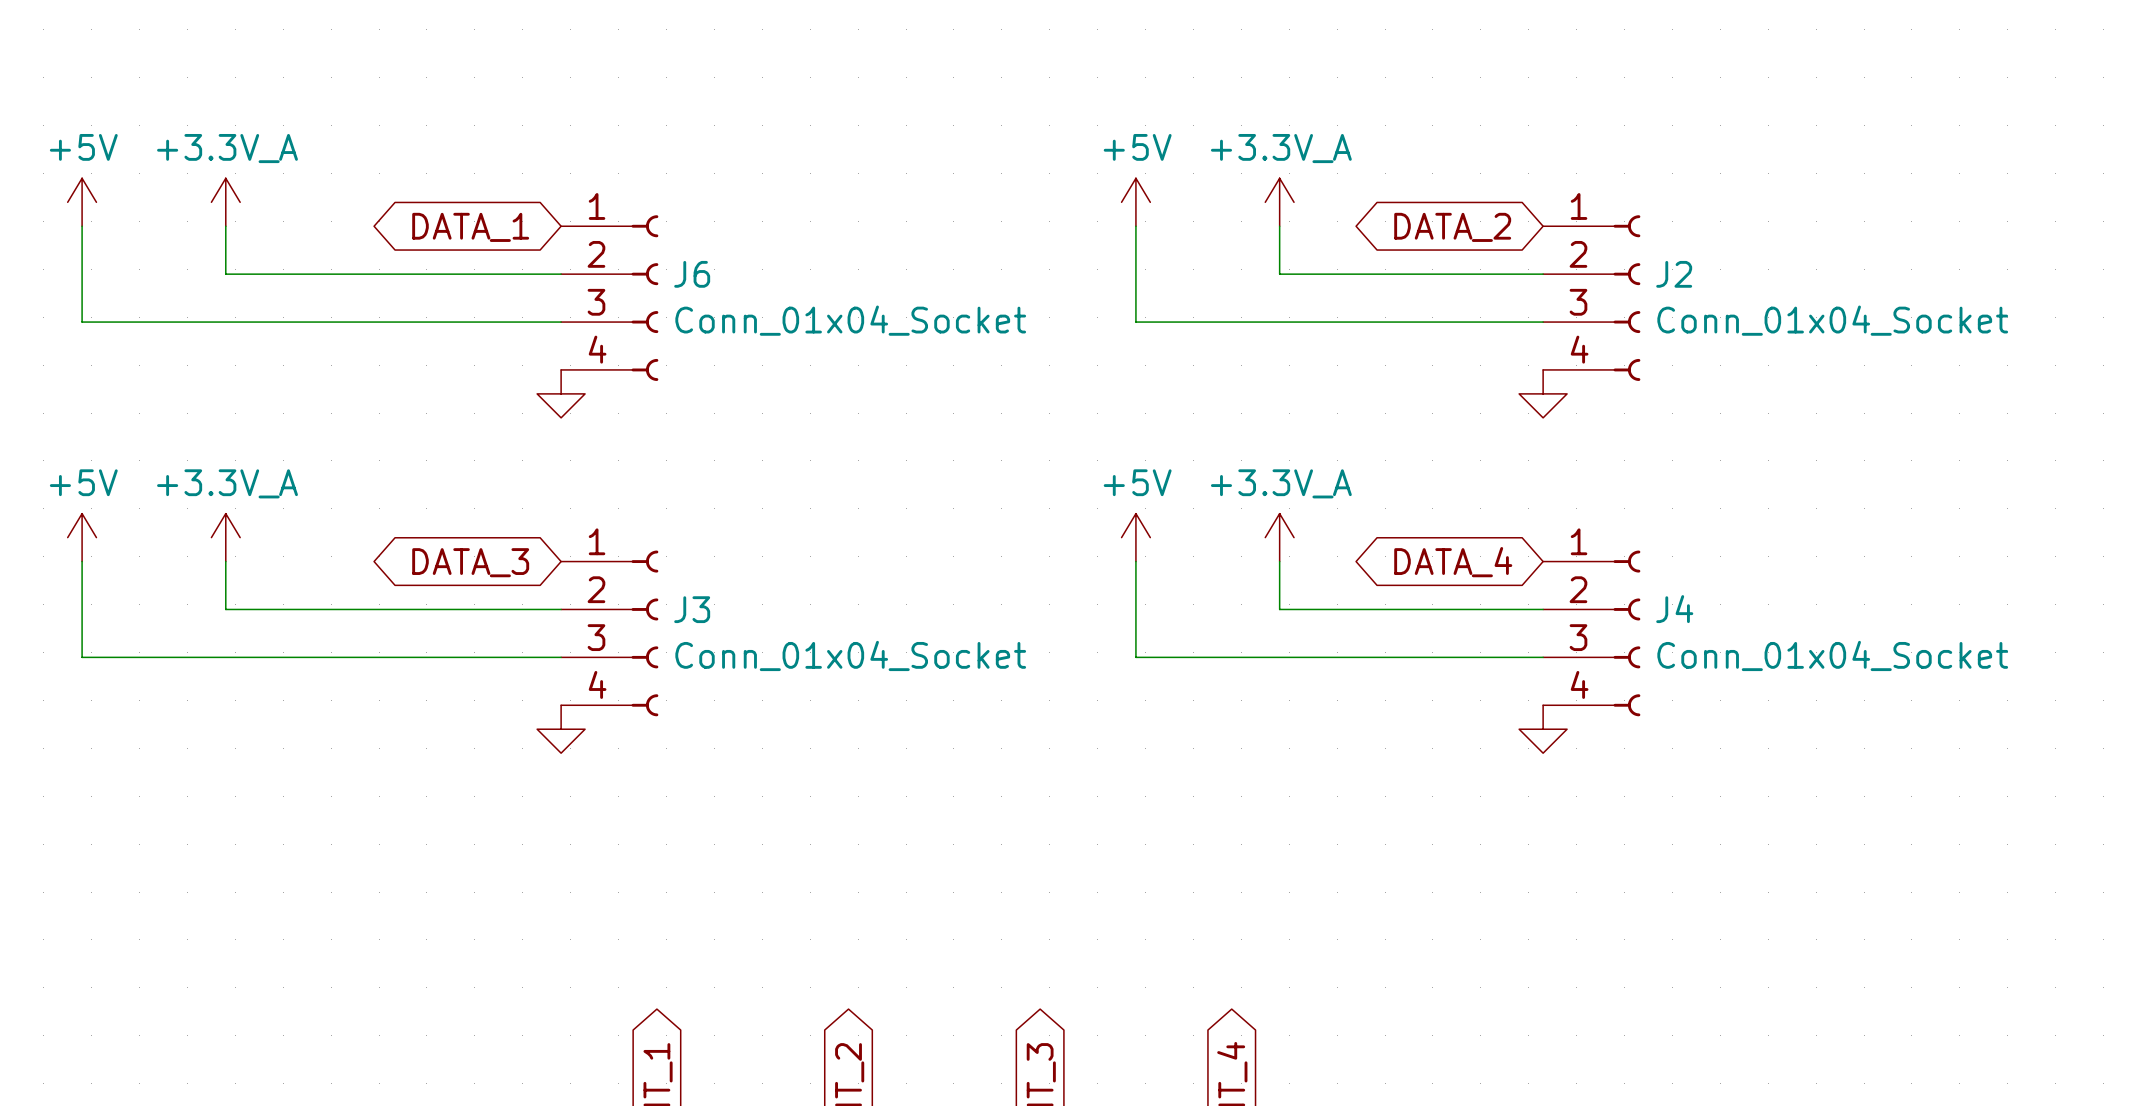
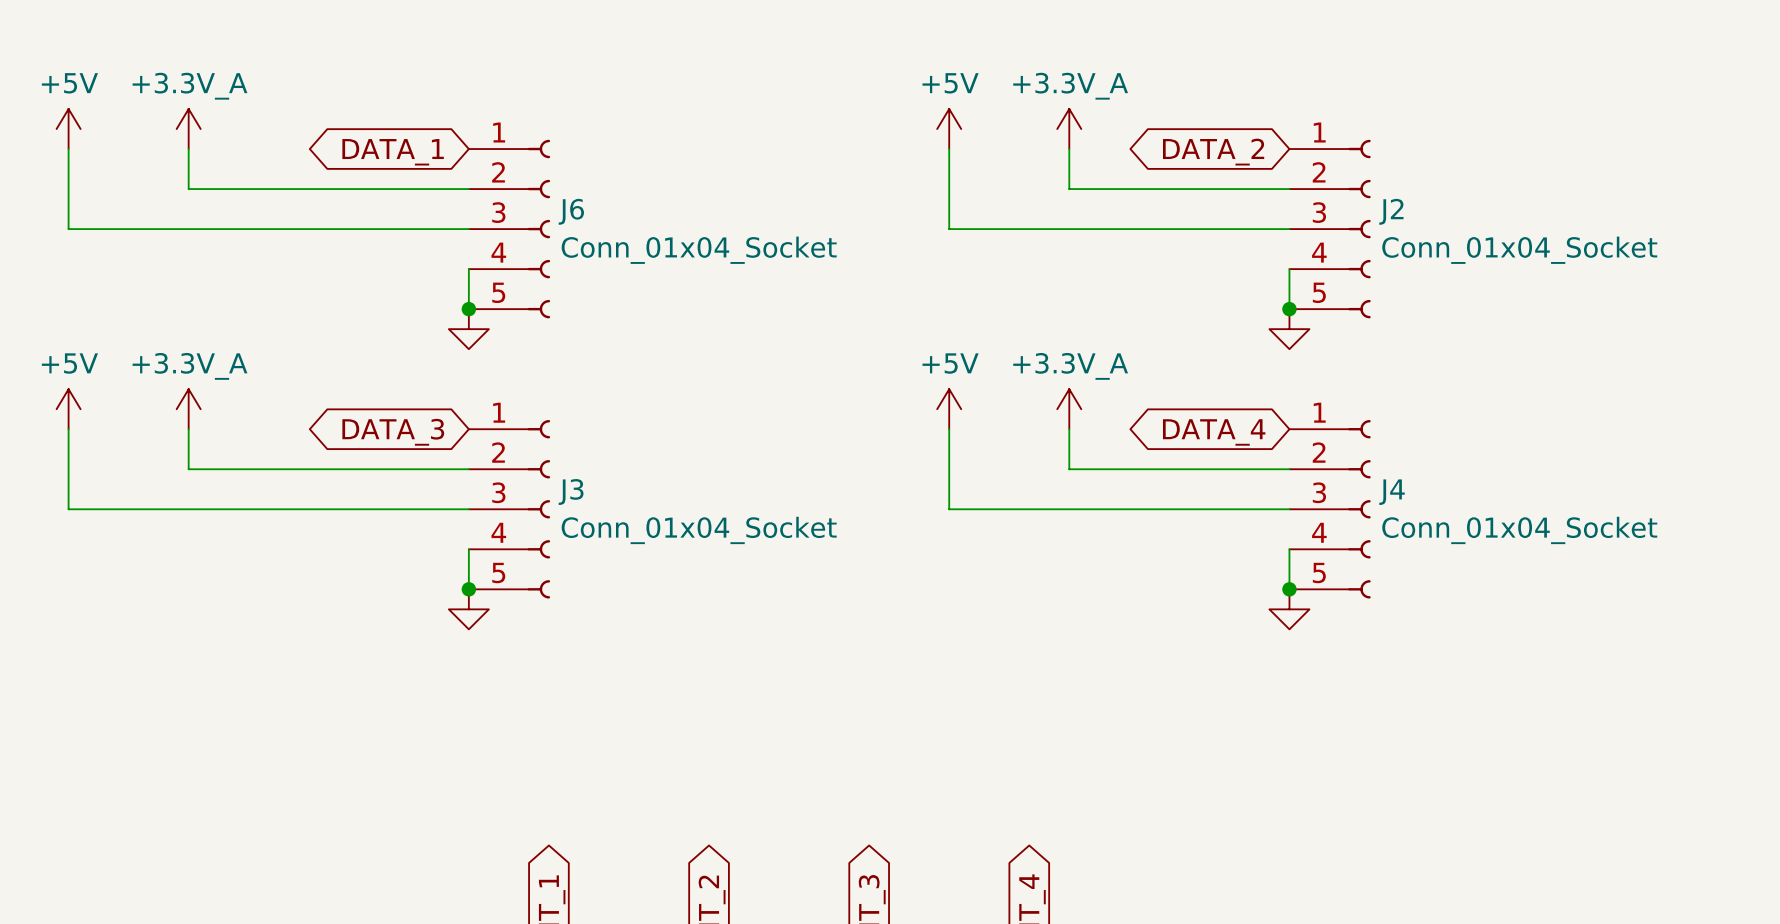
wire: none -> (188, 149) (188, 189) (468, 189)
wire: none -> (1069, 149) (1069, 189) (1289, 189)
power symbol position: +5V (82, 202) -> +5V (68, 129)
power symbol position: +3.3V_A (225, 202) -> +3.3V_A (188, 129)
power symbol position: +5V (1135, 202) -> +5V (949, 129)
power symbol position: +3.3V_A (1279, 202) -> +3.3V_A (1069, 129)
J6 symbol: [561, 215, 659, 381] -> [468, 139, 551, 319]
J2 symbol: [1543, 215, 1641, 381] -> [1289, 139, 1371, 319]
wire: (225, 226) (225, 274) -> (68, 229) (188, 229)
wire: (1279, 226) (1279, 274) -> (949, 229) (1069, 229)
global label position: DATA_1 (470, 227) -> DATA_1 (393, 152)
global label position: DATA_2 (1452, 227) -> DATA_2 (1213, 152)
wire: (82, 274) (82, 322) (561, 322) -> (468, 309) (468, 269)
wire: (1135, 274) (1135, 322) (1543, 322) -> (1289, 309) (1289, 269)
junction: none -> (468, 309)
junction: none -> (1289, 309)
wire: none -> (188, 429) (188, 469) (468, 469)
wire: none -> (1069, 429) (1069, 469) (1289, 469)
power symbol position: +5V (82, 537) -> +5V (68, 409)
power symbol position: +3.3V_A (225, 537) -> +3.3V_A (188, 409)
power symbol position: +5V (1135, 537) -> +5V (949, 409)
power symbol position: +3.3V_A (1279, 537) -> +3.3V_A (1069, 409)
J3 symbol: [561, 550, 659, 717] -> [468, 420, 551, 599]
J4 symbol: [1543, 550, 1641, 717] -> [1289, 420, 1371, 599]
wire: (225, 561) (225, 609) -> (68, 509) (188, 509)
wire: (1279, 561) (1279, 609) -> (949, 509) (1069, 509)
global label position: DATA_3 (470, 562) -> DATA_3 (393, 432)
global label position: DATA_4 (1453, 562) -> DATA_4 (1214, 432)
wire: (82, 609) (82, 657) (561, 657) -> (468, 589) (468, 549)
wire: (1135, 609) (1135, 657) (1543, 657) -> (1289, 589) (1289, 549)
junction: none -> (468, 589)
junction: none -> (1289, 589)

